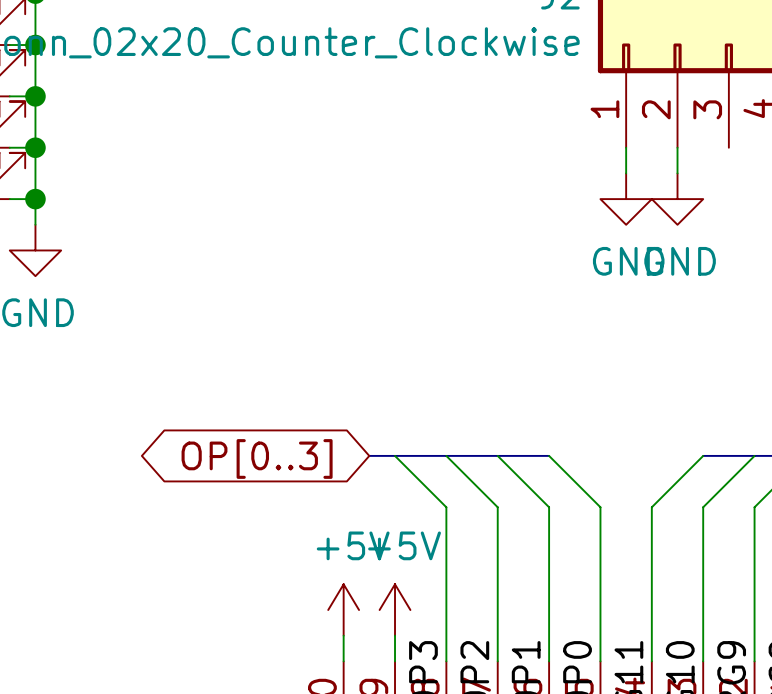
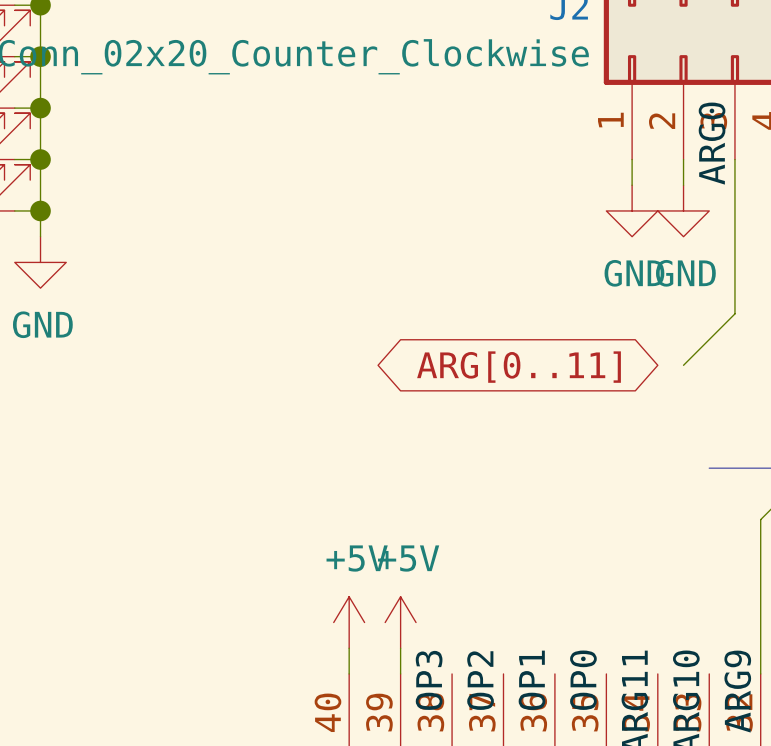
label: none -> ARG0 (712, 143)
wire: none -> (734, 159) (734, 313) (683, 365)
global label: none -> ARG[0..11] (519, 367)
bus: (369, 455) (549, 455) -> none
wire: (395, 455) (446, 507) (446, 661) -> none
wire: (446, 455) (497, 507) (497, 661) -> none
wire: (497, 455) (549, 507) (549, 661) -> none
wire: (549, 455) (600, 507) (600, 661) -> none
wire: (703, 455) (651, 507) (651, 661) -> none
wire: (754, 455) (703, 507) (703, 661) -> none
global label: OP[0..3] (257, 458) -> none

